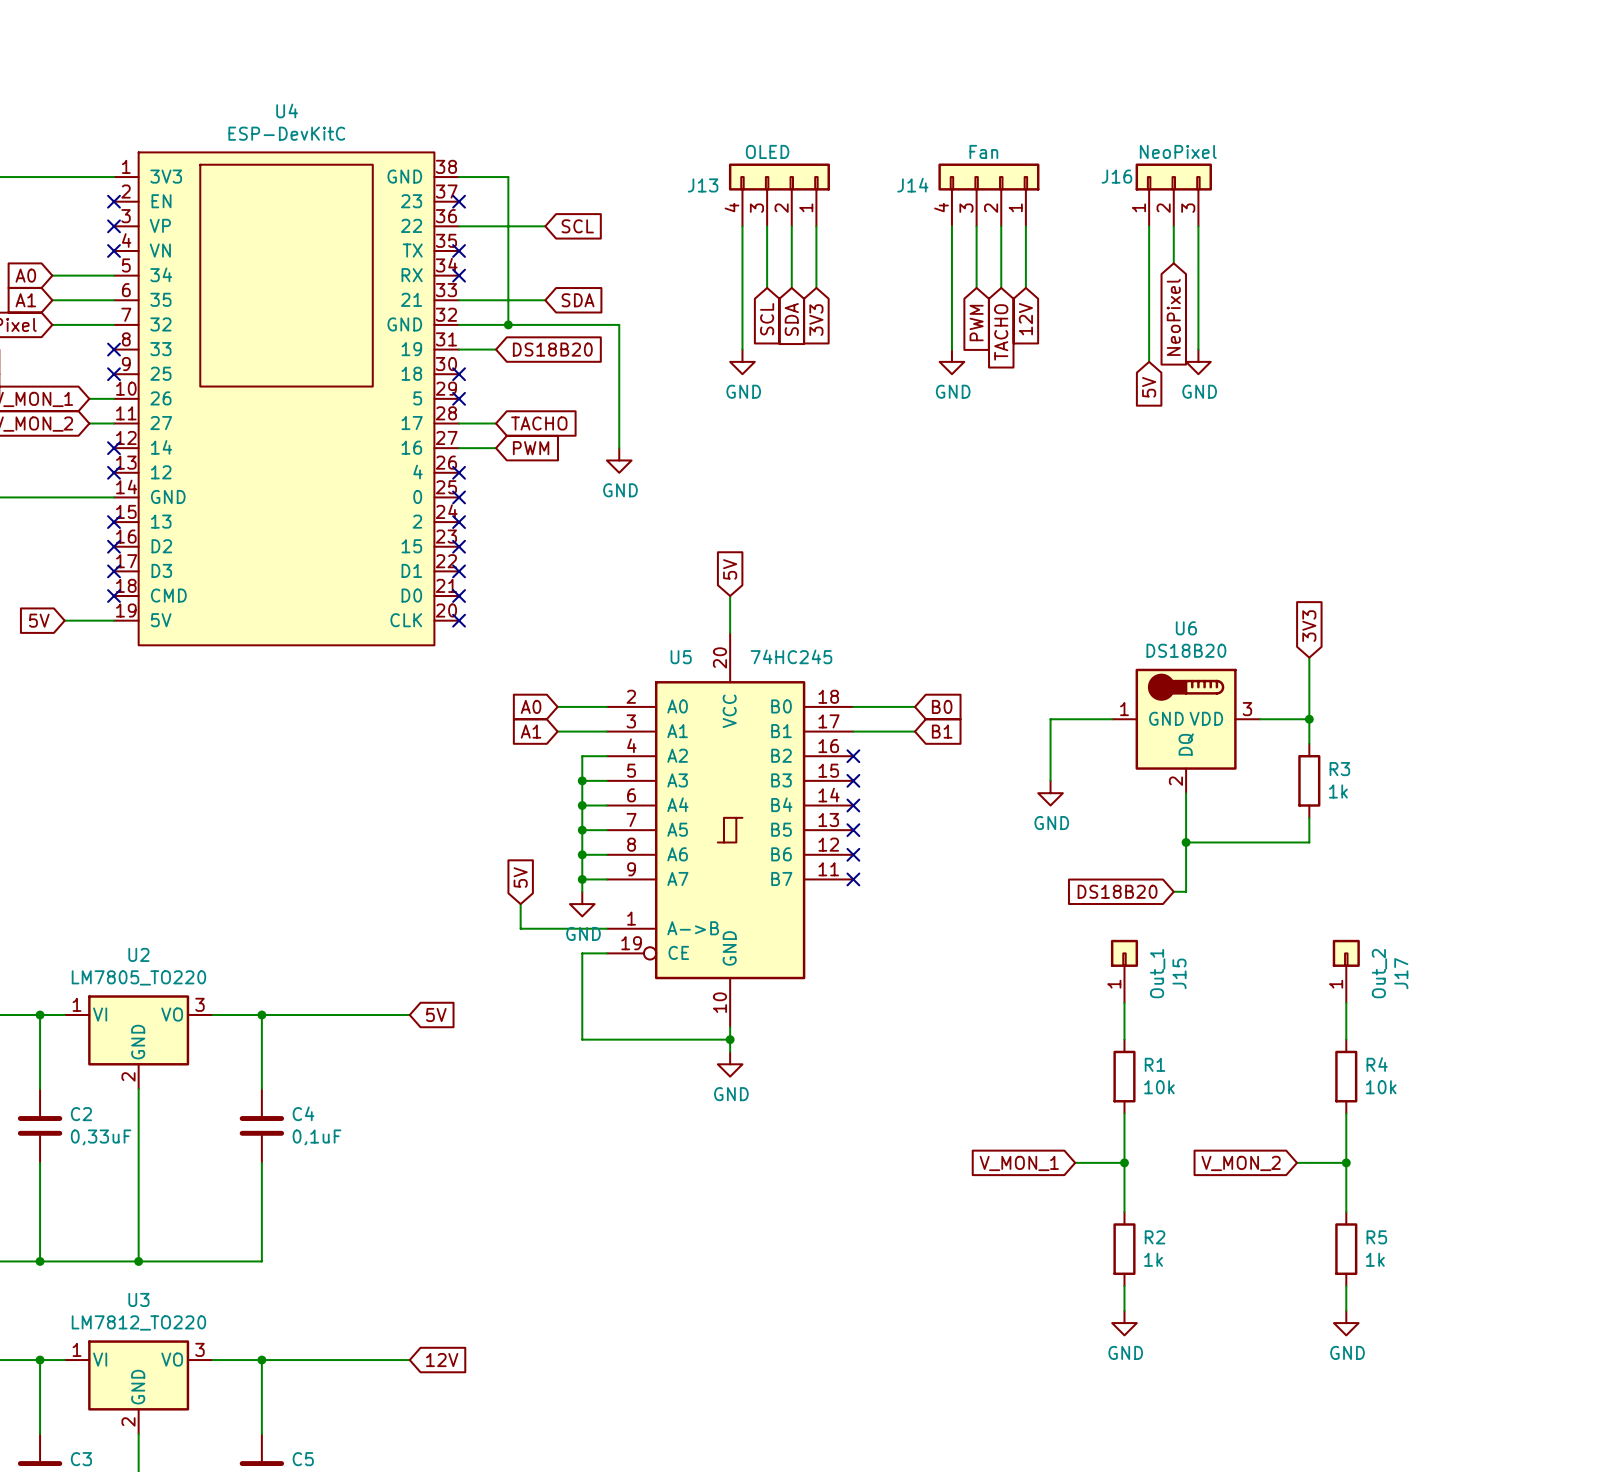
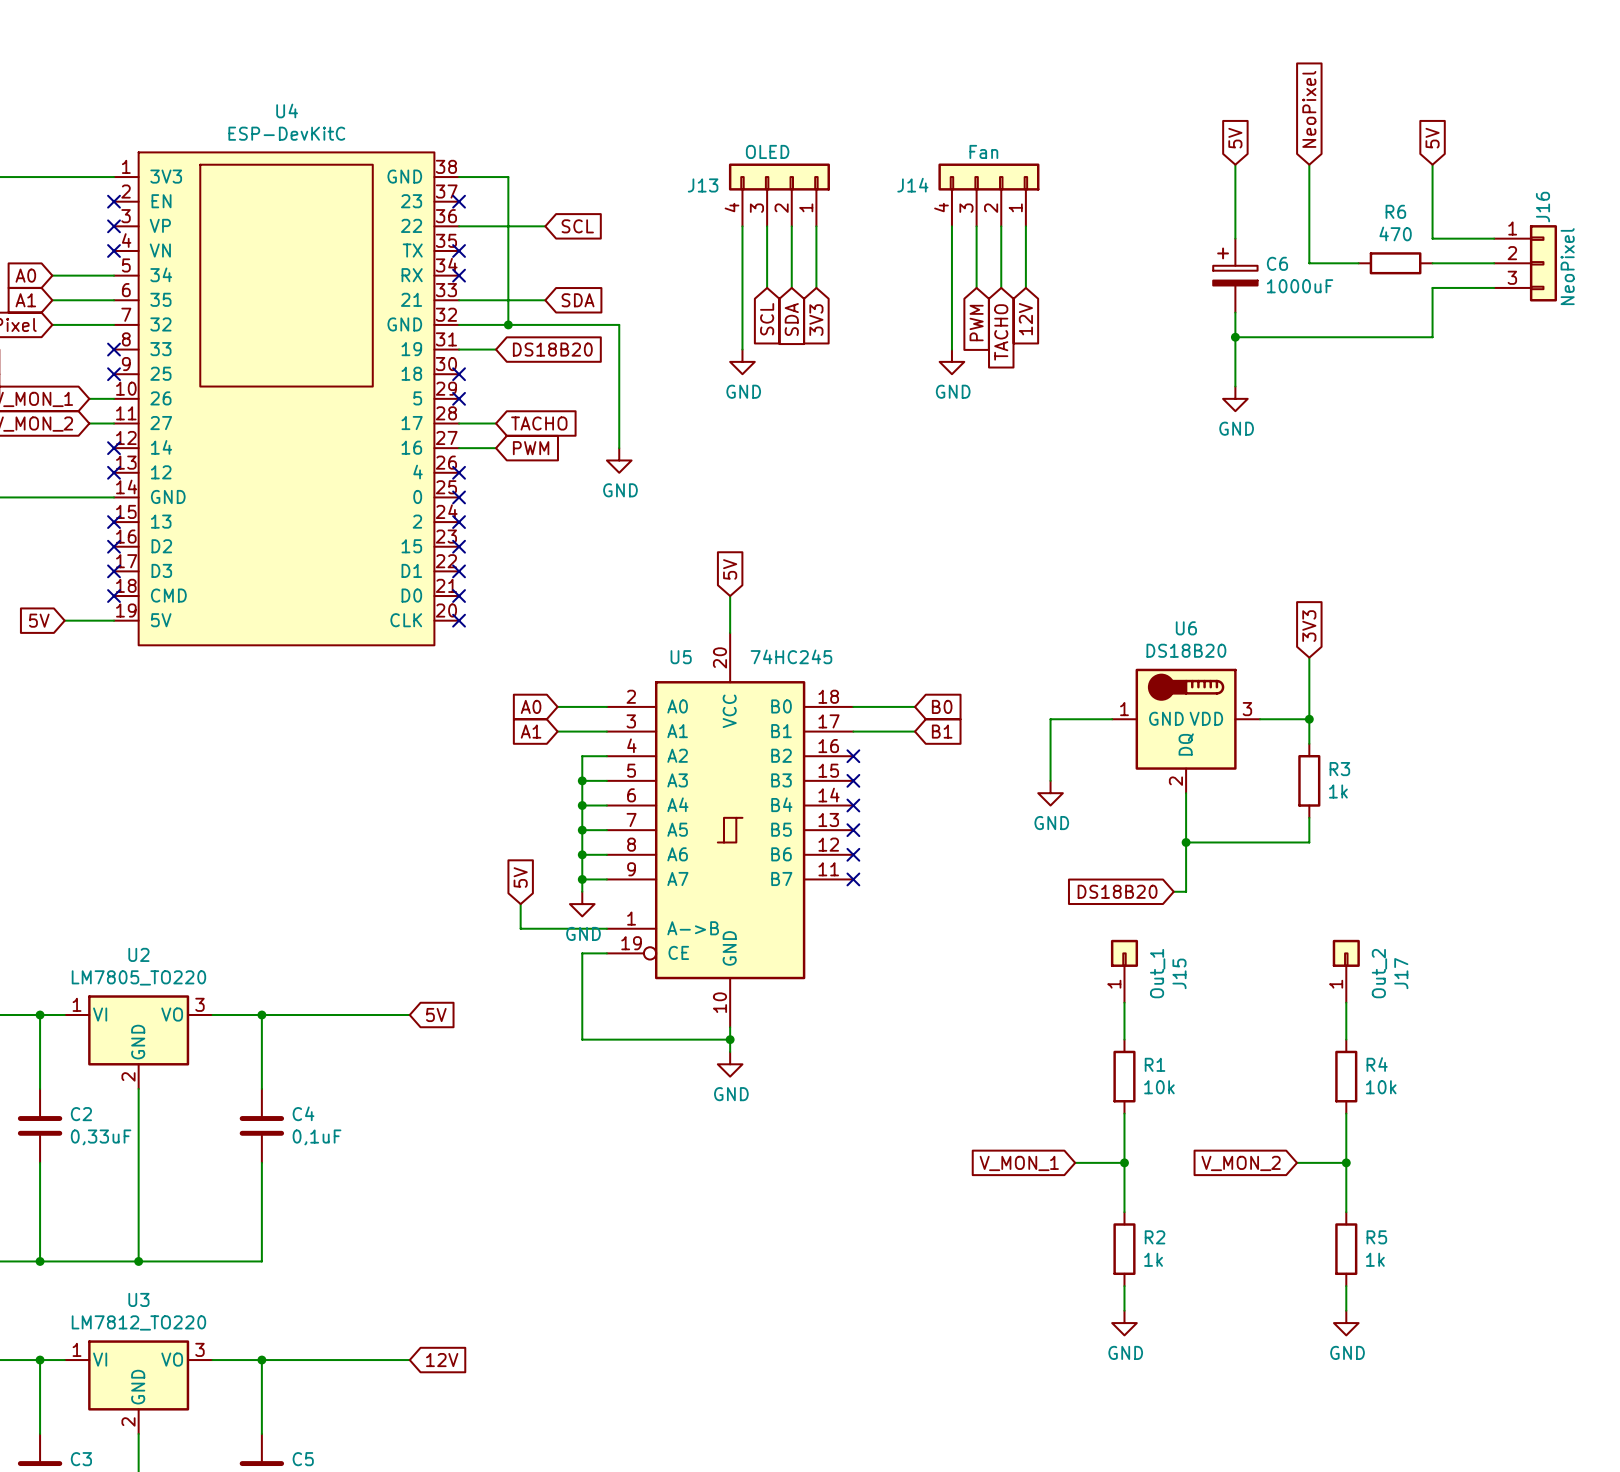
global label: none -> 5V (1235, 138)
global label: none -> 5V (1432, 138)
wire: none -> (1235, 164) (1235, 238)
wire: none -> (1309, 164) (1309, 263) (1358, 263)
wire: none -> (1432, 164) (1432, 238) (1494, 238)
J16 rotation: 0° (1173, 177) -> 90° clockwise (1543, 263)
J16 position: (1173, 194) -> (1525, 263)
wire: (1149, 226) (1149, 361) -> none
wire: (1173, 226) (1173, 263) -> none
wire: (1198, 226) (1198, 349) -> none
R6: none -> 470 (1395, 263)
wire: none -> (1432, 263) (1494, 263)
C6: none -> 1000uF (1235, 275)
wire: none -> (1494, 287) (1432, 287) (1432, 337) (1235, 337)
wire: none -> (1235, 312) (1235, 386)
global label rotation: 0° (1173, 317) -> 180° (1309, 109)
global label position: NeoPixel (1173, 317) -> NeoPixel (1309, 109)
junction: none -> (1235, 337)
power symbol position: GND (1198, 361) -> GND (1235, 398)
global label: 5V (1149, 387) -> none

